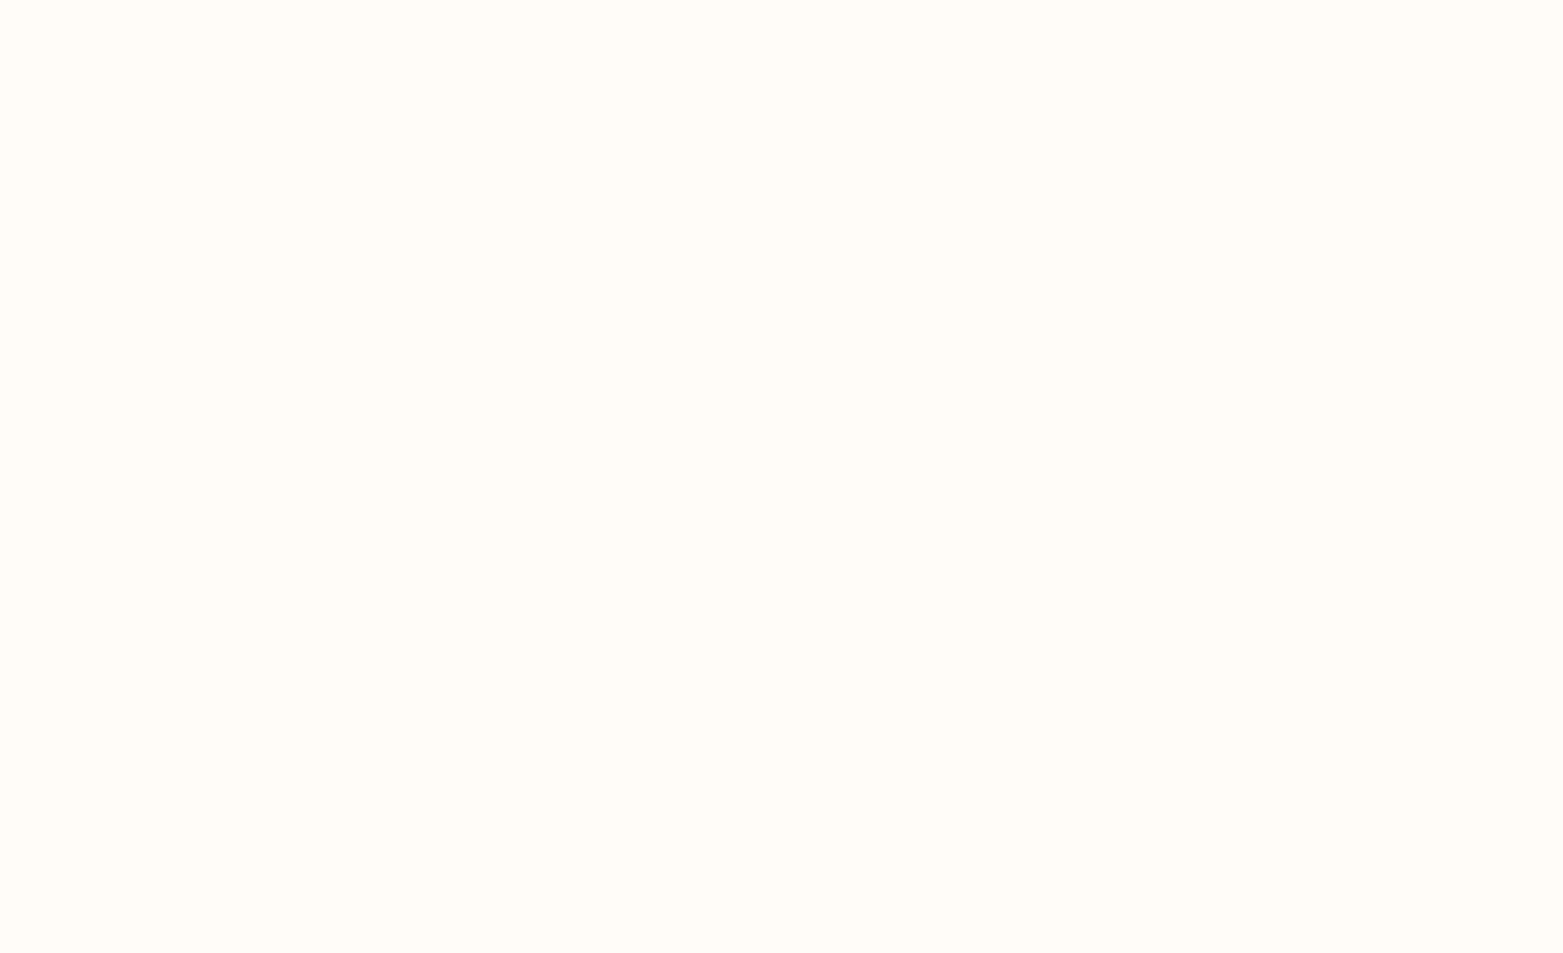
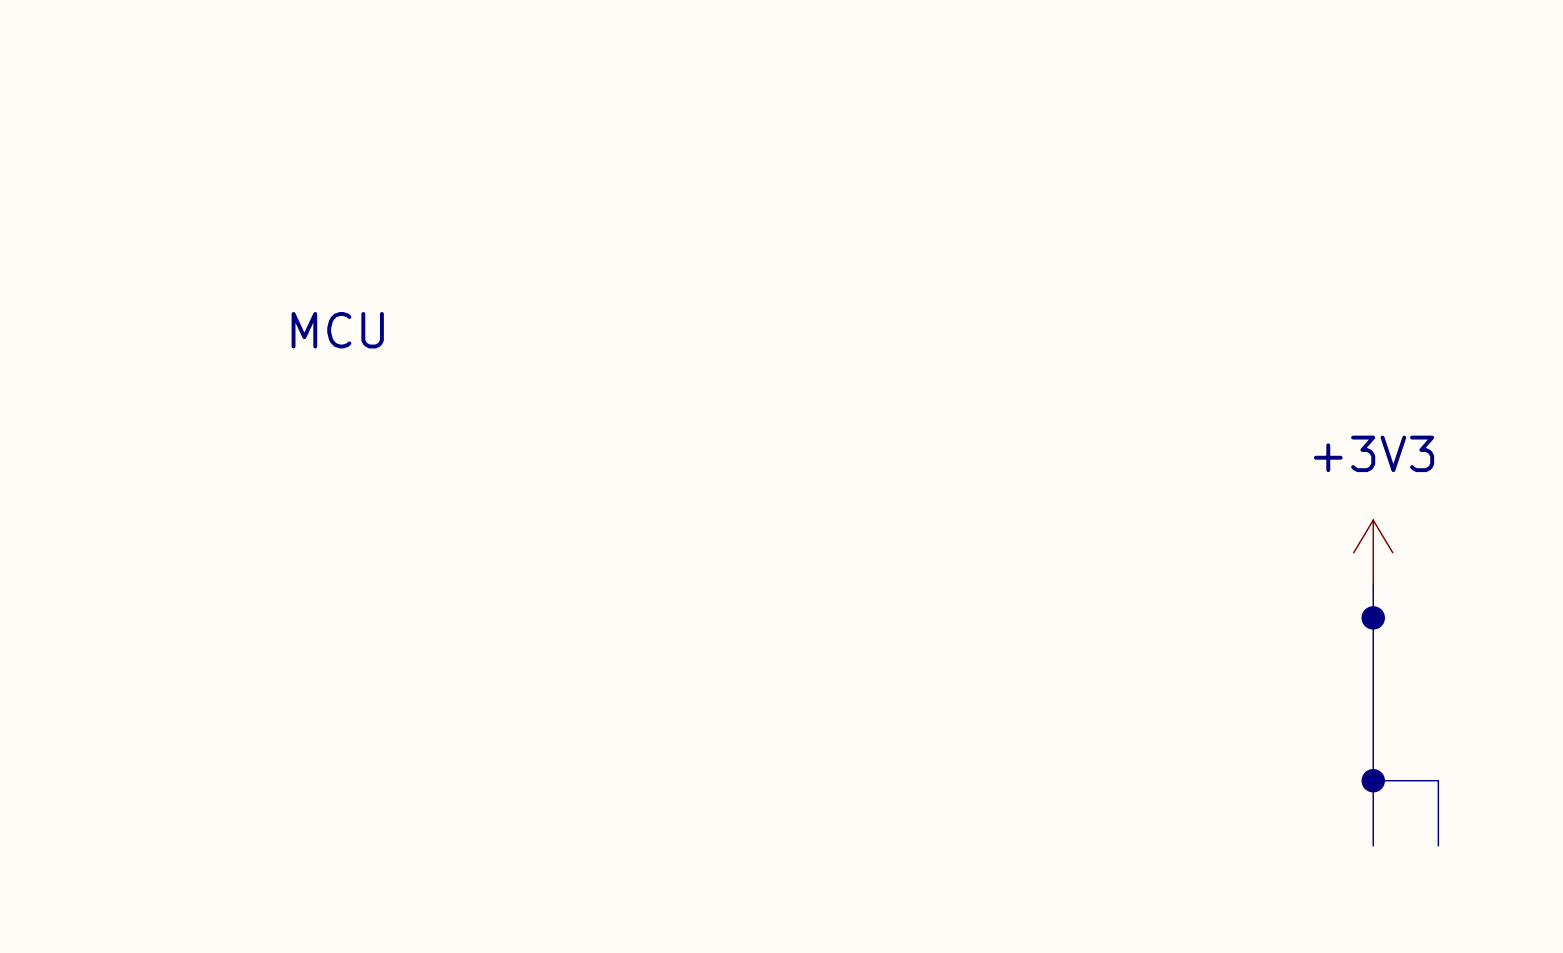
text: none -> MCU (337, 330)
power symbol: none -> +3V3 (1373, 552)
wire: none -> (1373, 585) (1373, 845)
junction: none -> (1373, 617)
wire: none -> (1373, 780) (1438, 780) (1438, 845)
junction: none -> (1373, 780)

